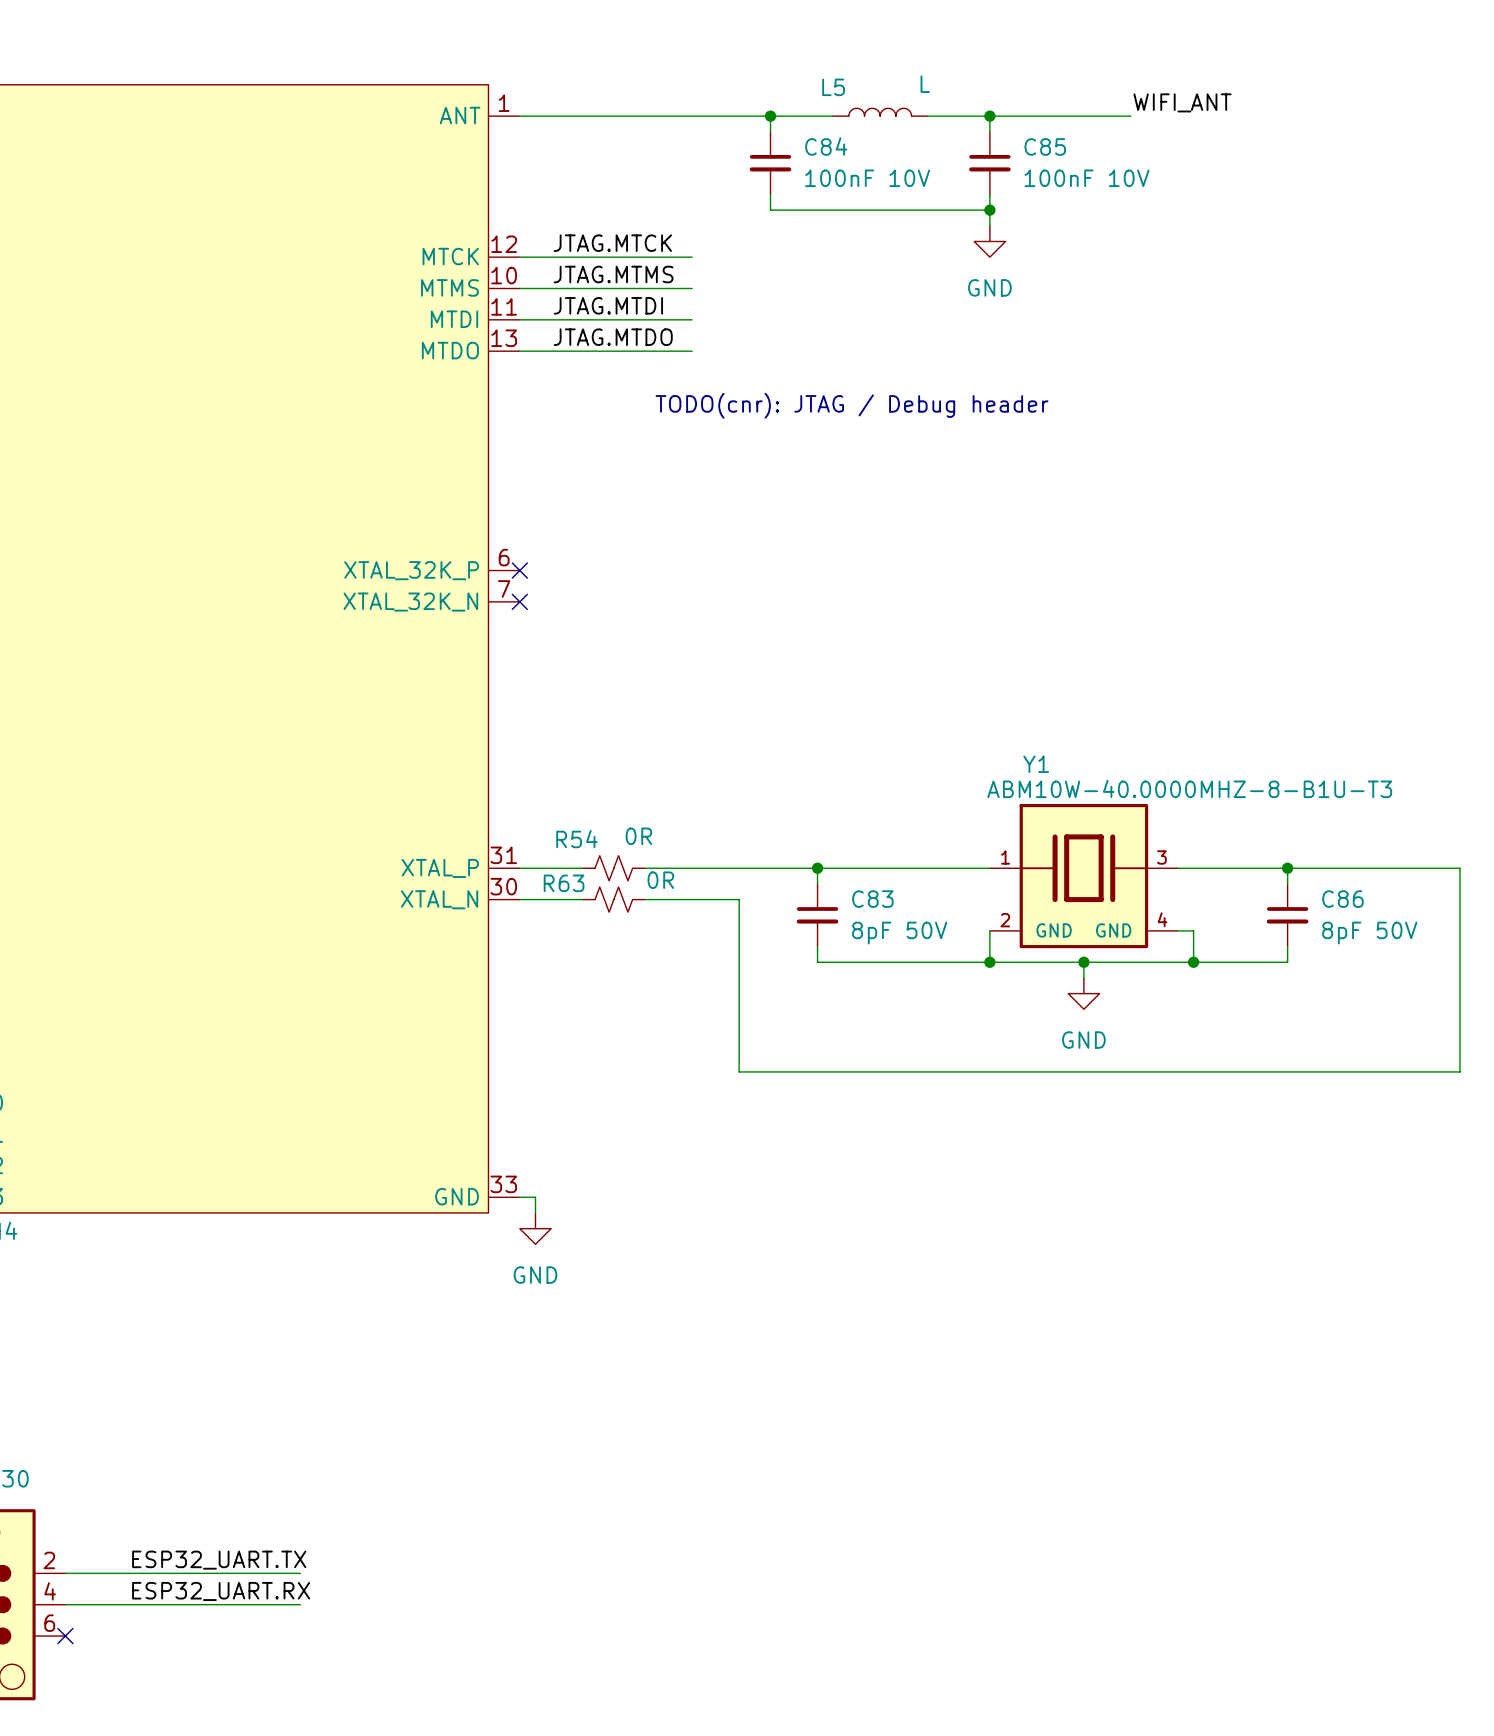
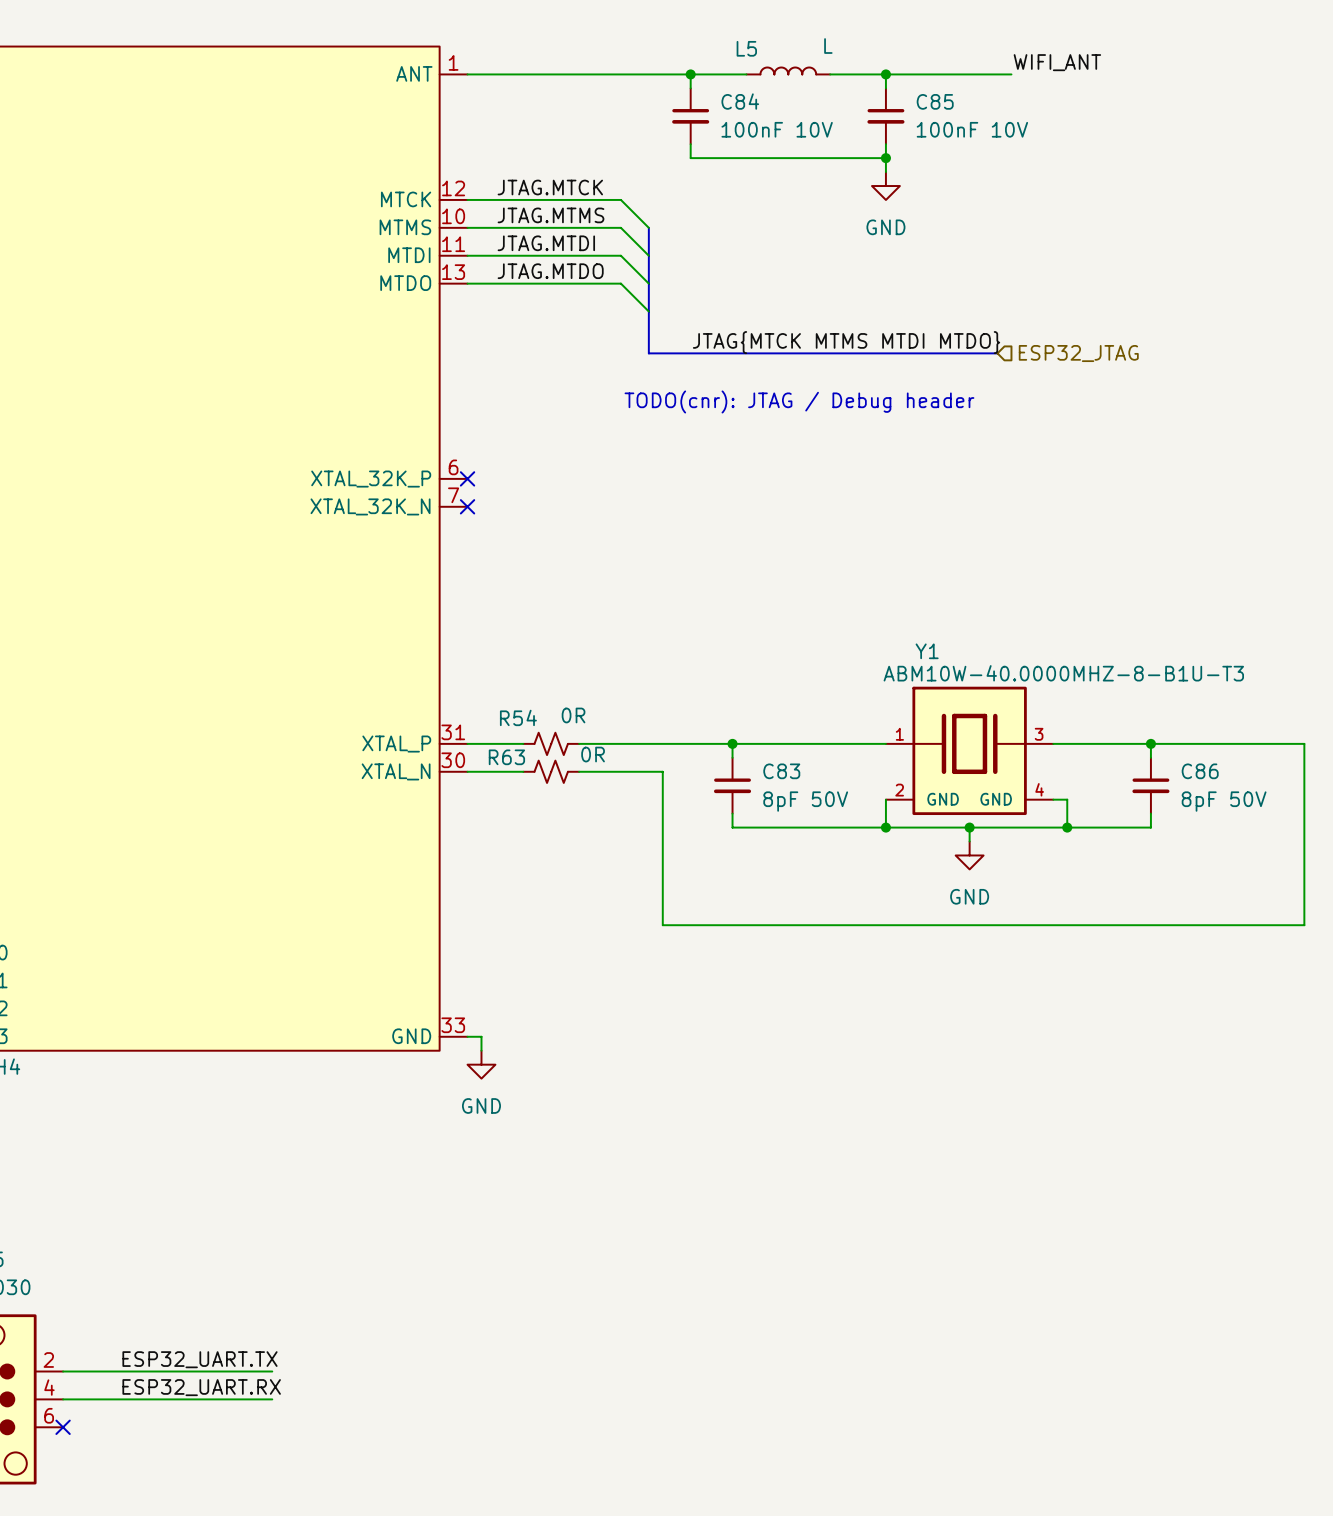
wire: none -> (620, 199) (648, 227)
wire: none -> (620, 227) (648, 255)
bus: none -> (648, 227) (648, 353) (997, 353)
wire: none -> (620, 255) (648, 283)
wire: none -> (620, 283) (648, 311)
text position: TODO(cnr): JTAG / Debug header (852, 405) -> TODO(cnr): JTAG / Debug header (799, 401)
label: none -> JTAG{MTCK MTMS MTDI MTDO} (846, 342)
hierarchical label: none -> ESP32_JTAG (1078, 353)

